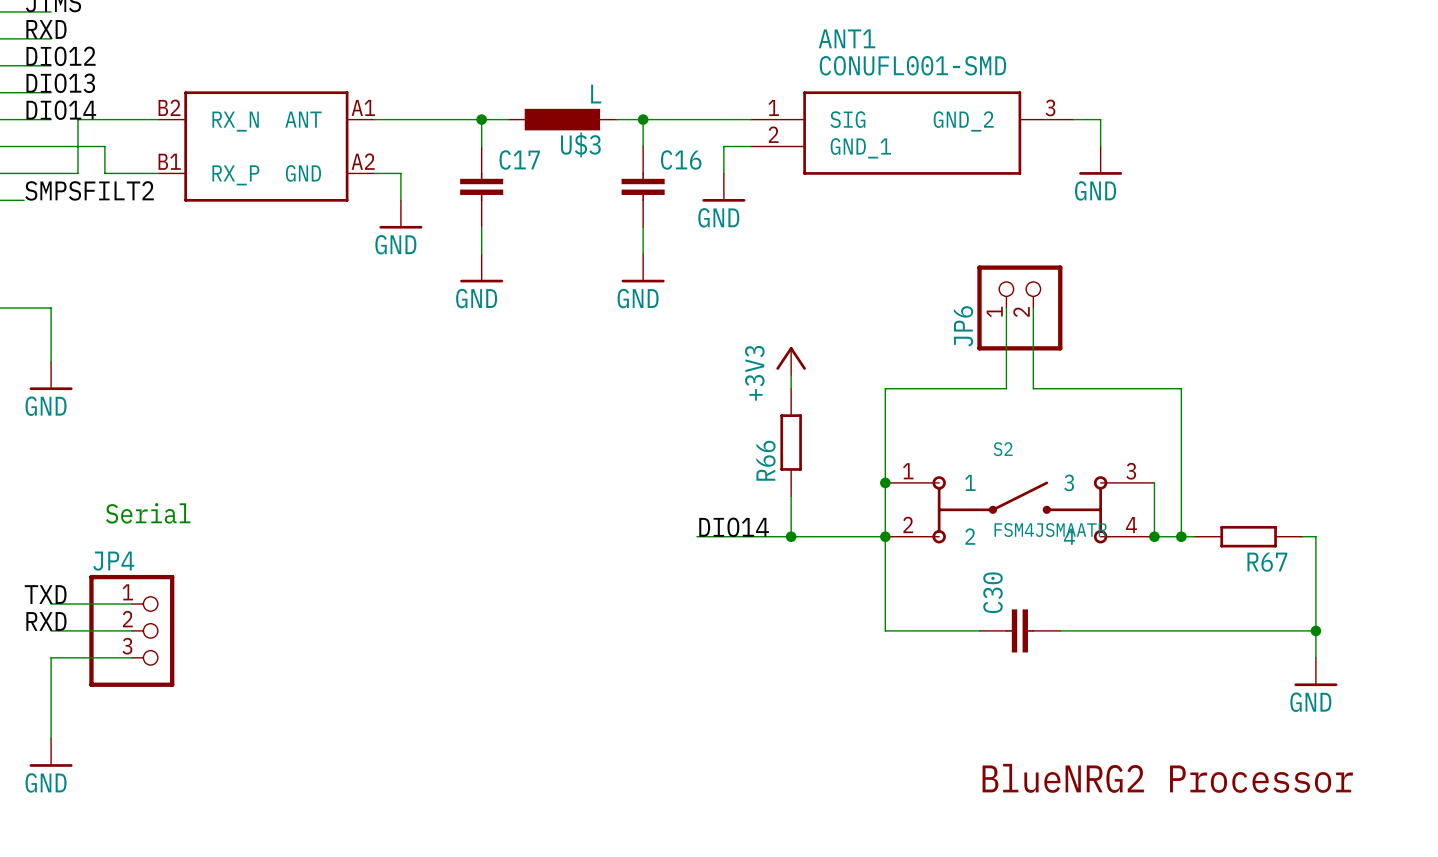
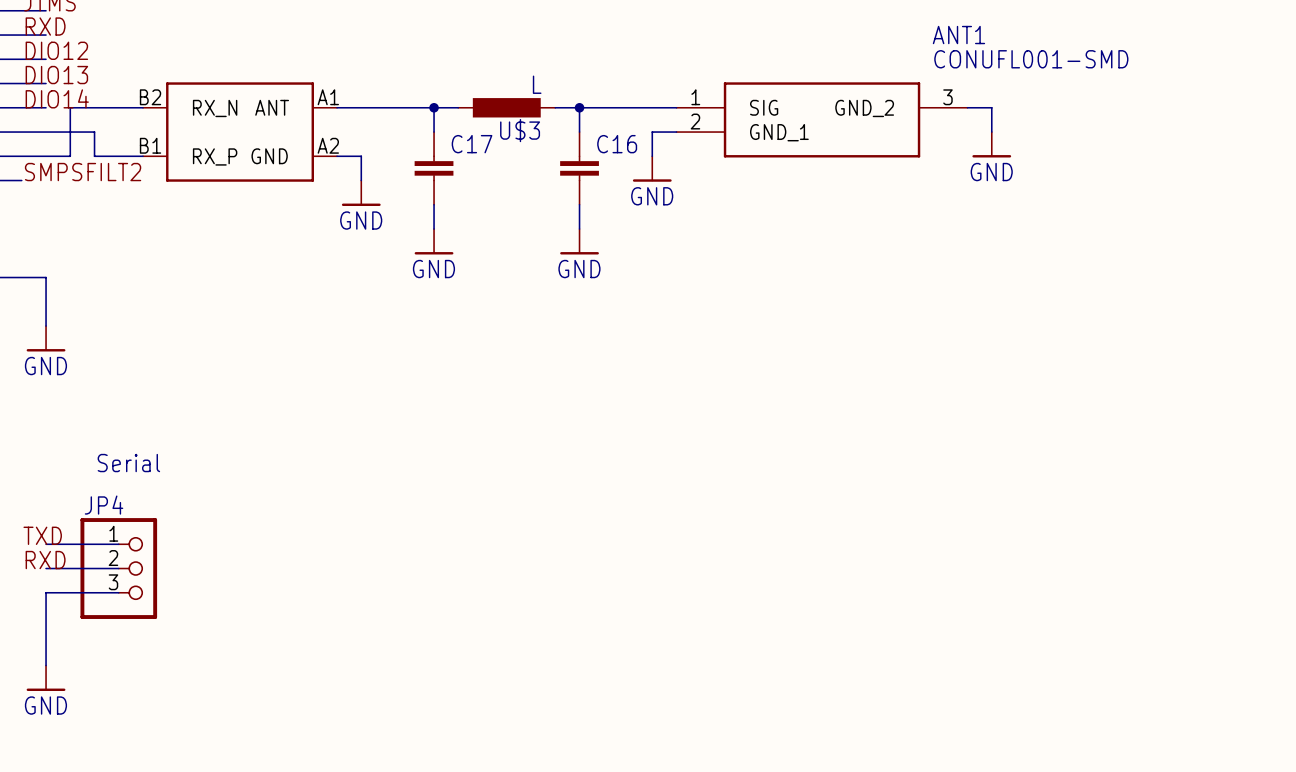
ANT1 name position: ANT1 (847, 38) -> ANT1 (958, 35)
ANT1 value position: CONUFL001-SMD (912, 65) -> CONUFL001-SMD (1031, 59)
wire: (1006, 307) (1006, 388) (885, 388) (885, 630) (979, 630) -> none
JP6: (1019, 307) -> none
wire: (1033, 307) (1033, 388) (1181, 388) (1181, 536) -> none
power symbol: +3V3 (791, 361) -> none
wire: (791, 375) (791, 388) -> none
R66: (791, 442) -> none
junction: (885, 482) -> none
wire: (1154, 482) (1154, 536) (1194, 536) -> none
wire: (791, 496) (791, 536) -> none
S2: FSM4JSMAATR (1019, 509) -> none
label: DIO14 (734, 527) -> none
wire: (696, 536) (885, 536) -> none
junction: (791, 536) -> none
junction: (885, 536) -> none
junction: (1154, 536) -> none
junction: (1181, 536) -> none
R67: (1248, 536) -> none
wire: (1302, 536) (1315, 536) (1315, 657) -> none
C30: (1019, 630) -> none
wire: (1060, 630) (1315, 630) -> none
junction: (1315, 630) -> none
power symbol: GND (1315, 671) -> none
text: BlueNRG2 Processor (1167, 778) -> none

